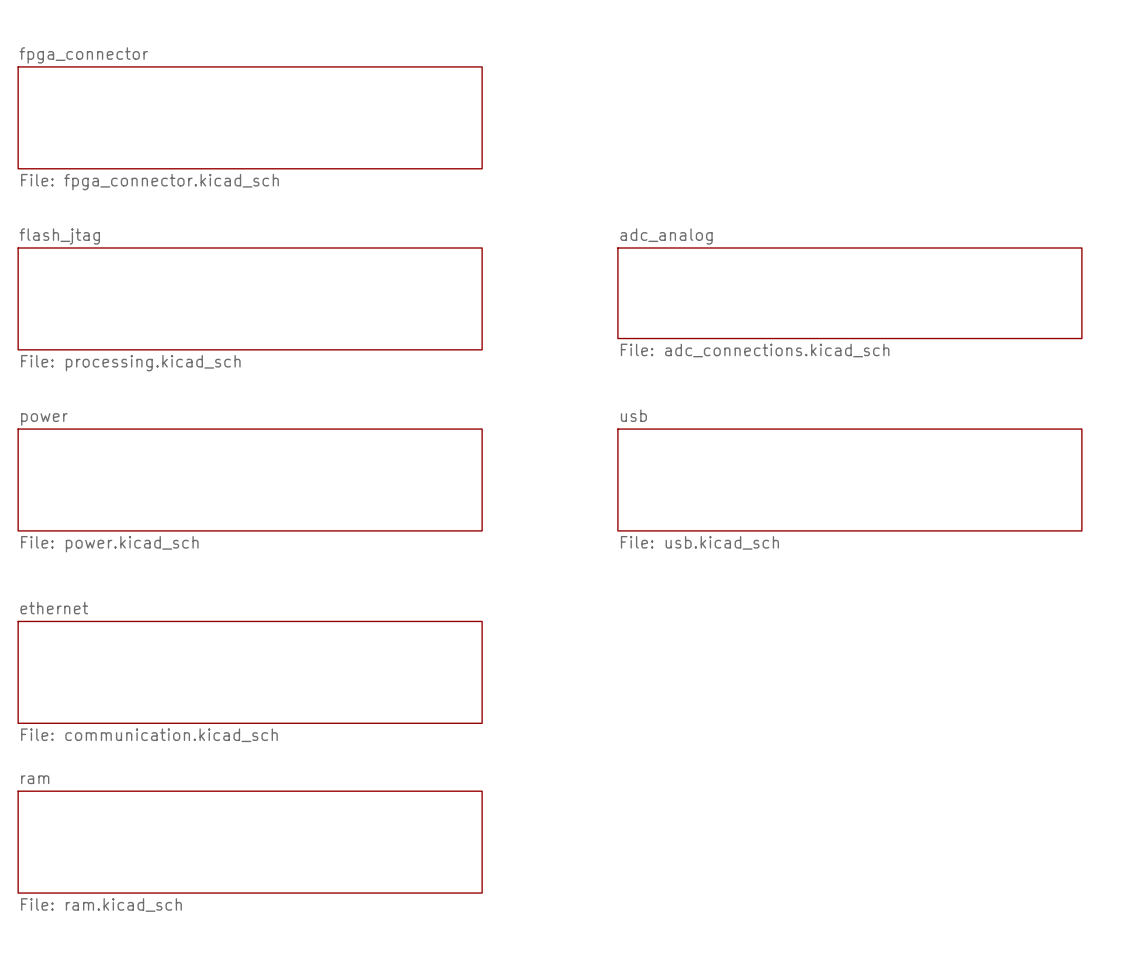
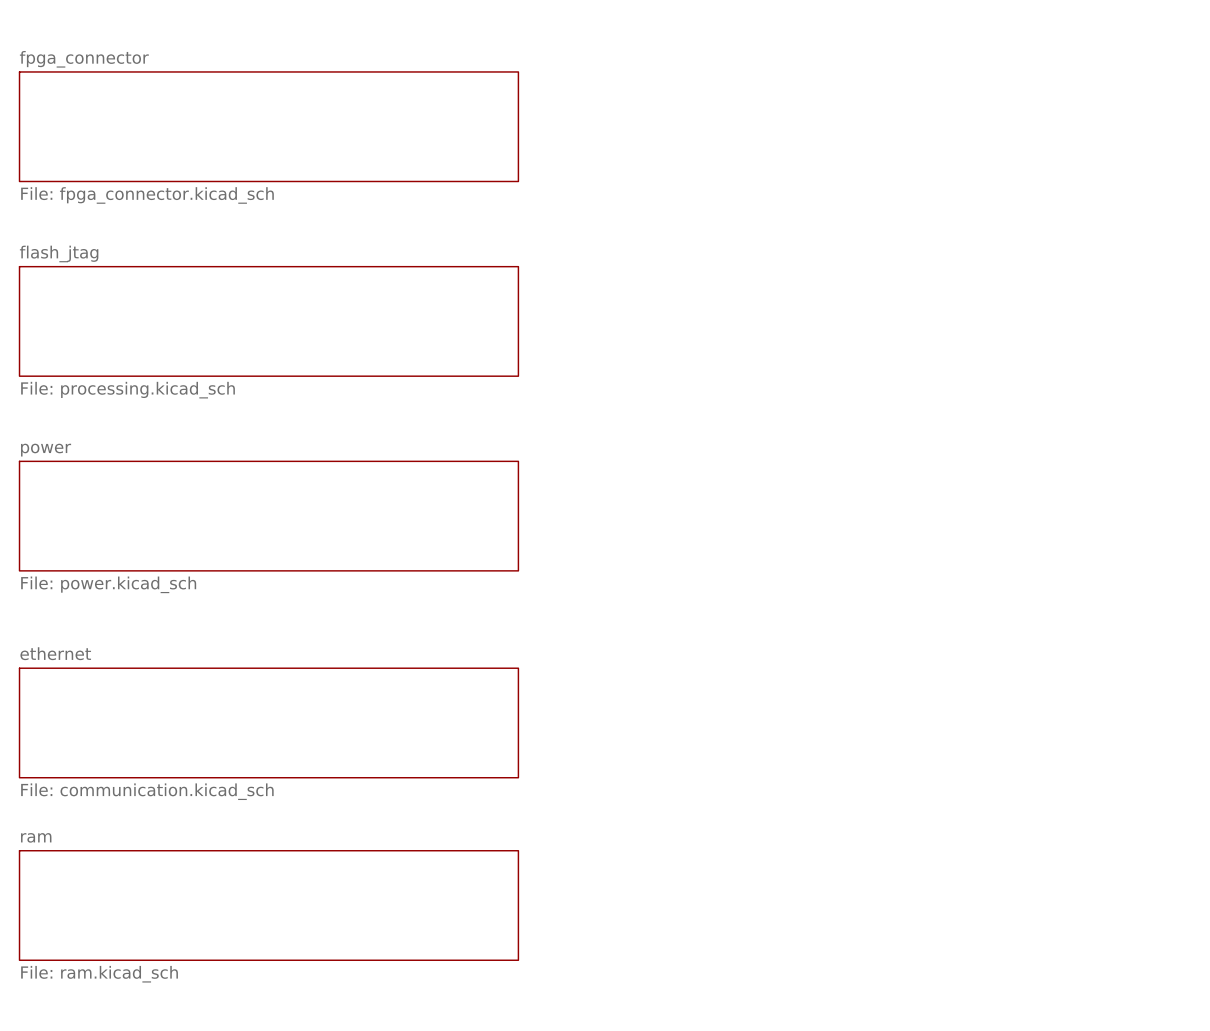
sheet adc_analog: File: adc_connections.kicad_sch (849, 293) -> none
sheet usb: File: usb.kicad_sch (849, 479) -> none

